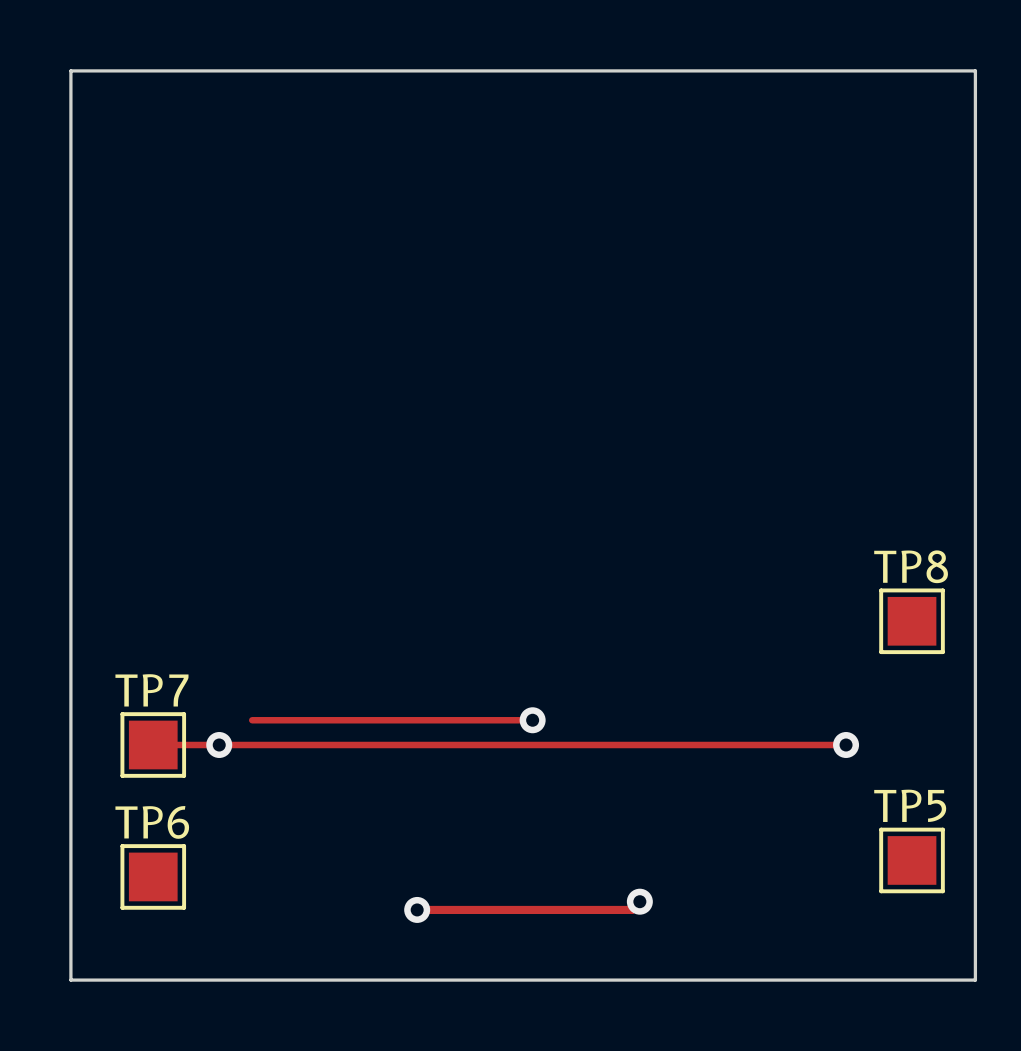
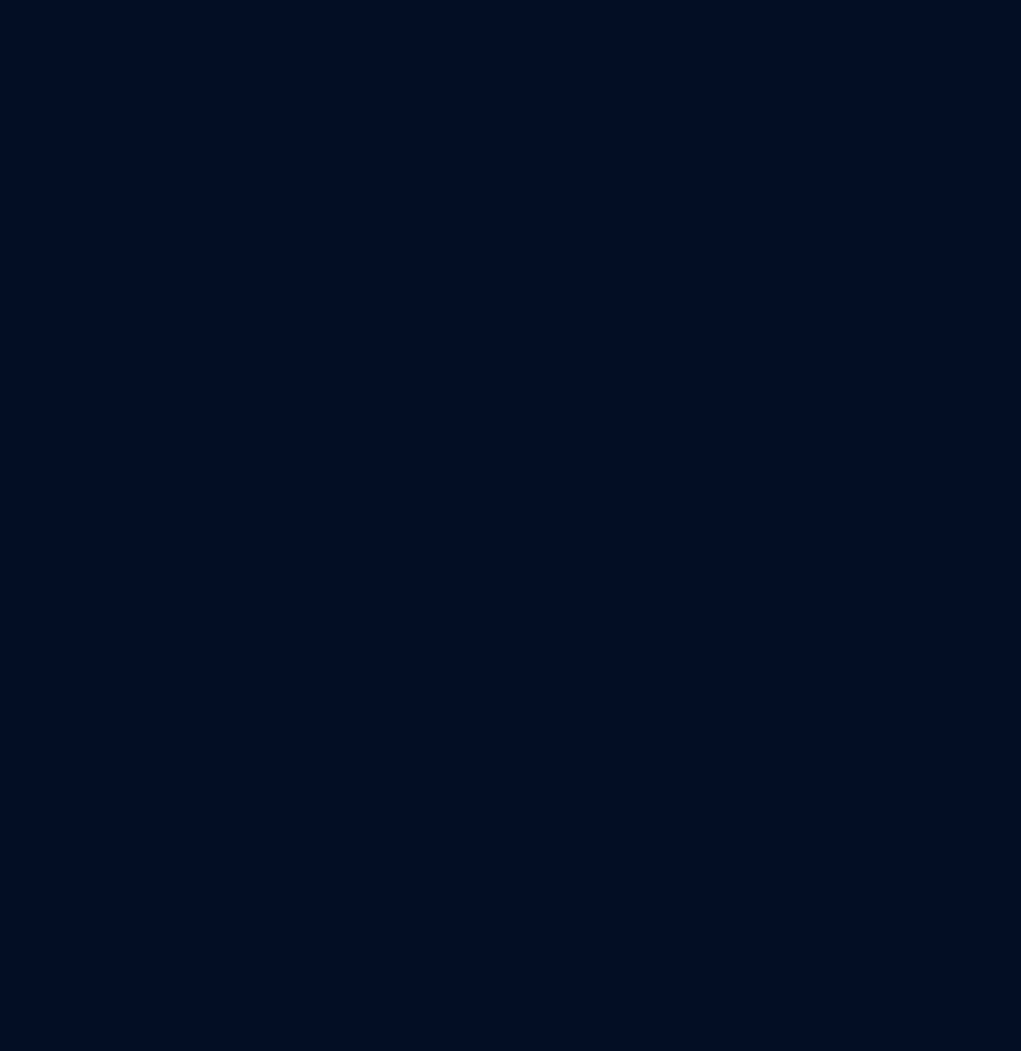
board edge: (70, 70) (975, 70) (975, 980) (70, 980) (70, 70) -> none
TP8: (912, 621) -> none
track: (252, 720) (532, 720) -> none
via: (532, 720) -> none
track: (153, 744) (846, 744) -> none
TP7: (153, 744) -> none
via: (219, 744) -> none
via: (846, 744) -> none
TP5: (912, 860) -> none
TP6: (153, 876) -> none
track: (639, 901) (631, 909) (417, 909) -> none
via: (639, 901) -> none
via: (417, 909) -> none

